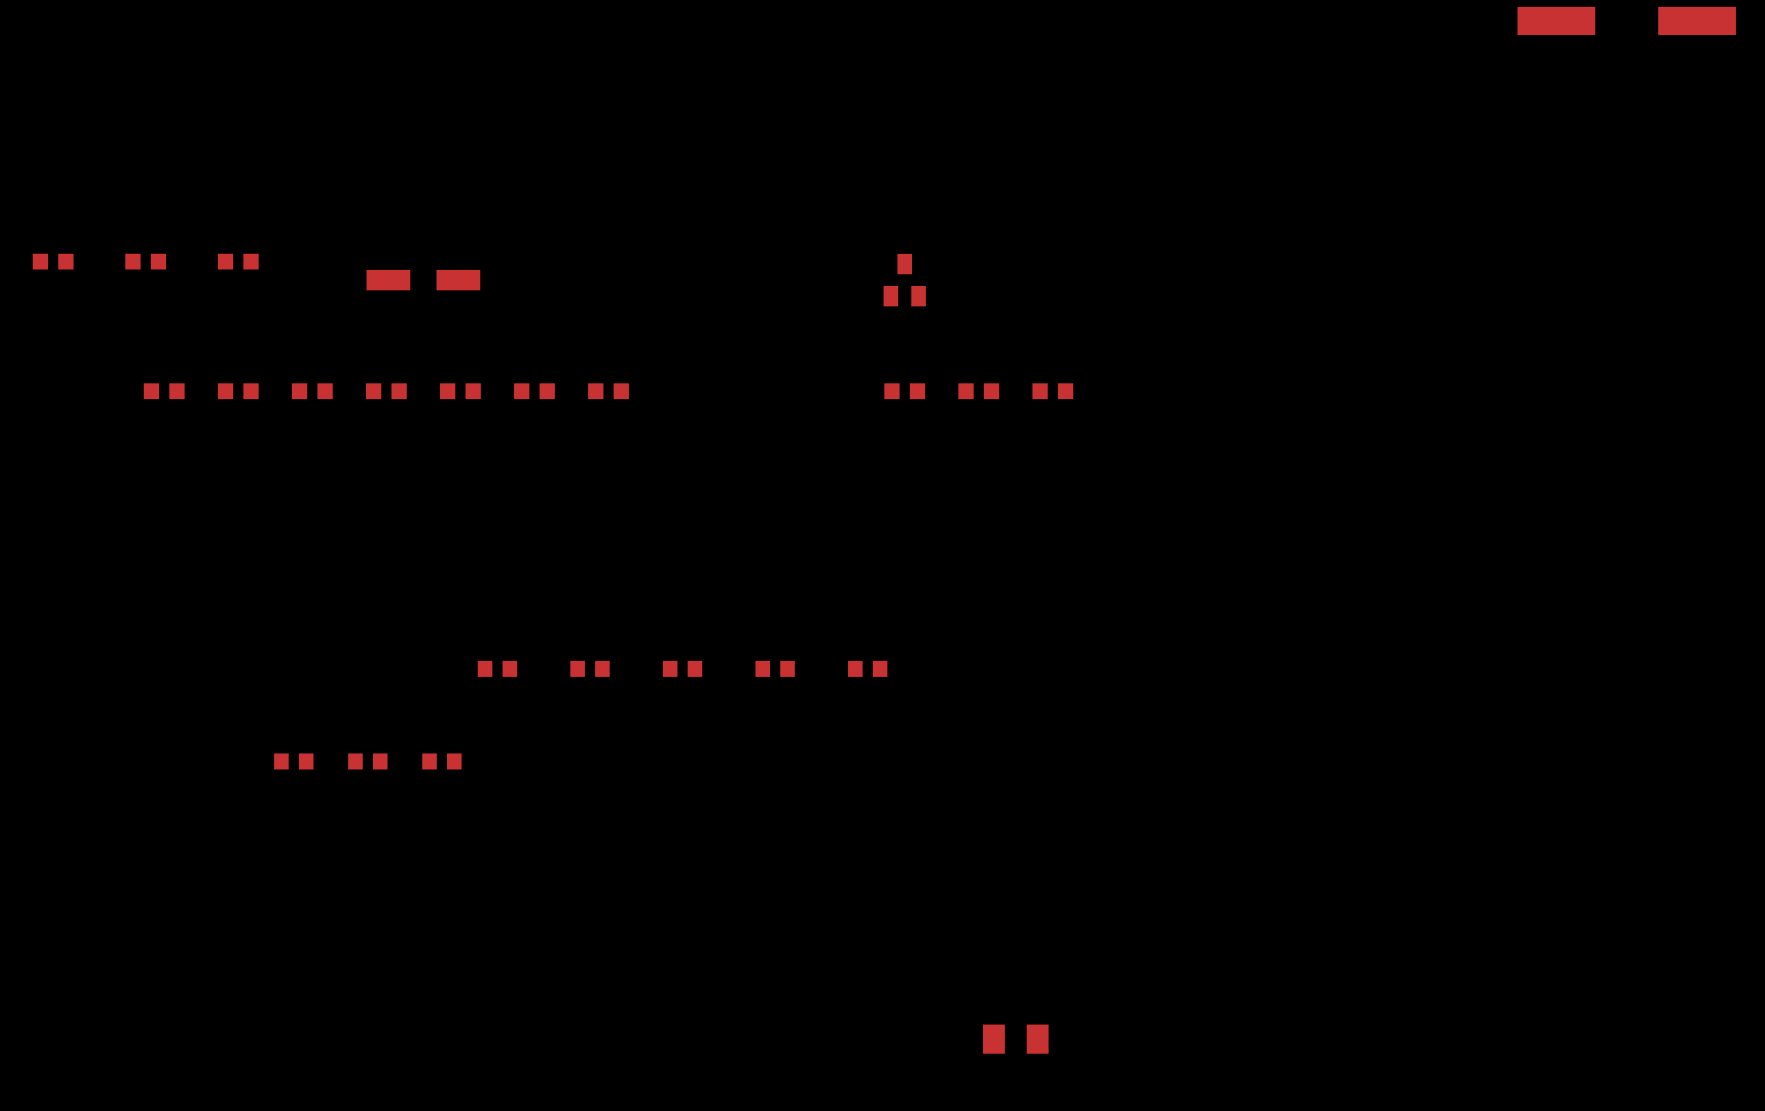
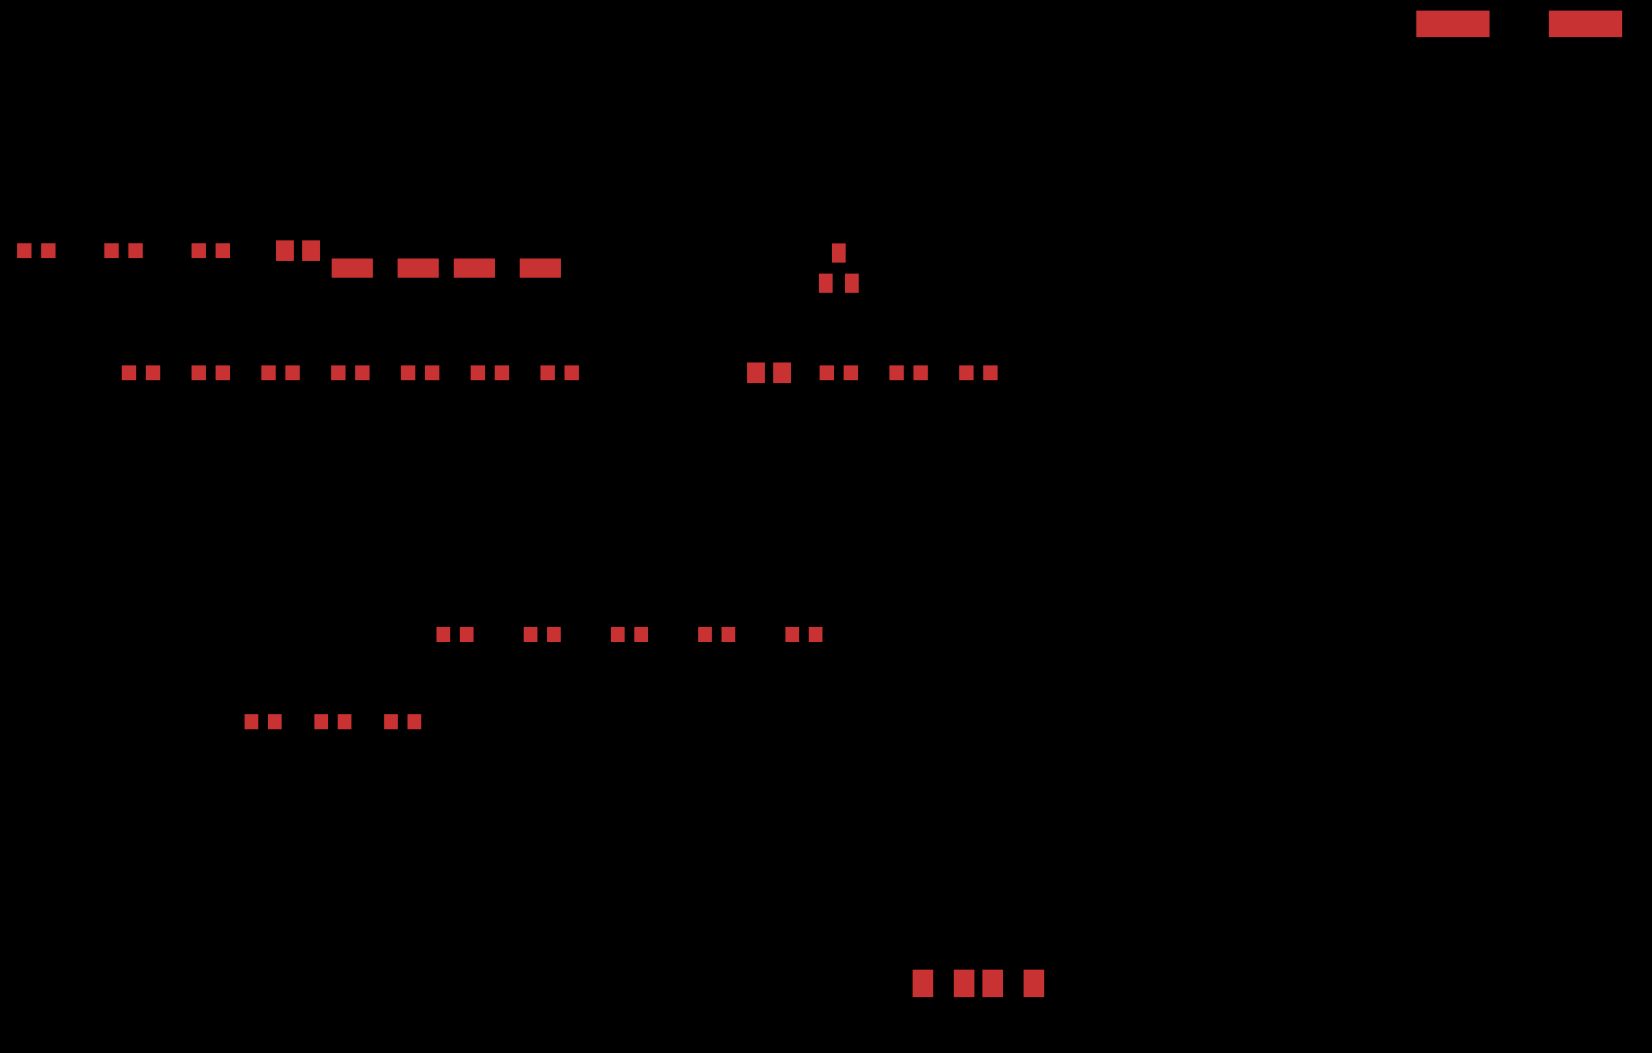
part: none -> (298, 250)
part: none -> (507, 268)
part: none -> (769, 372)
part: none -> (1013, 983)

